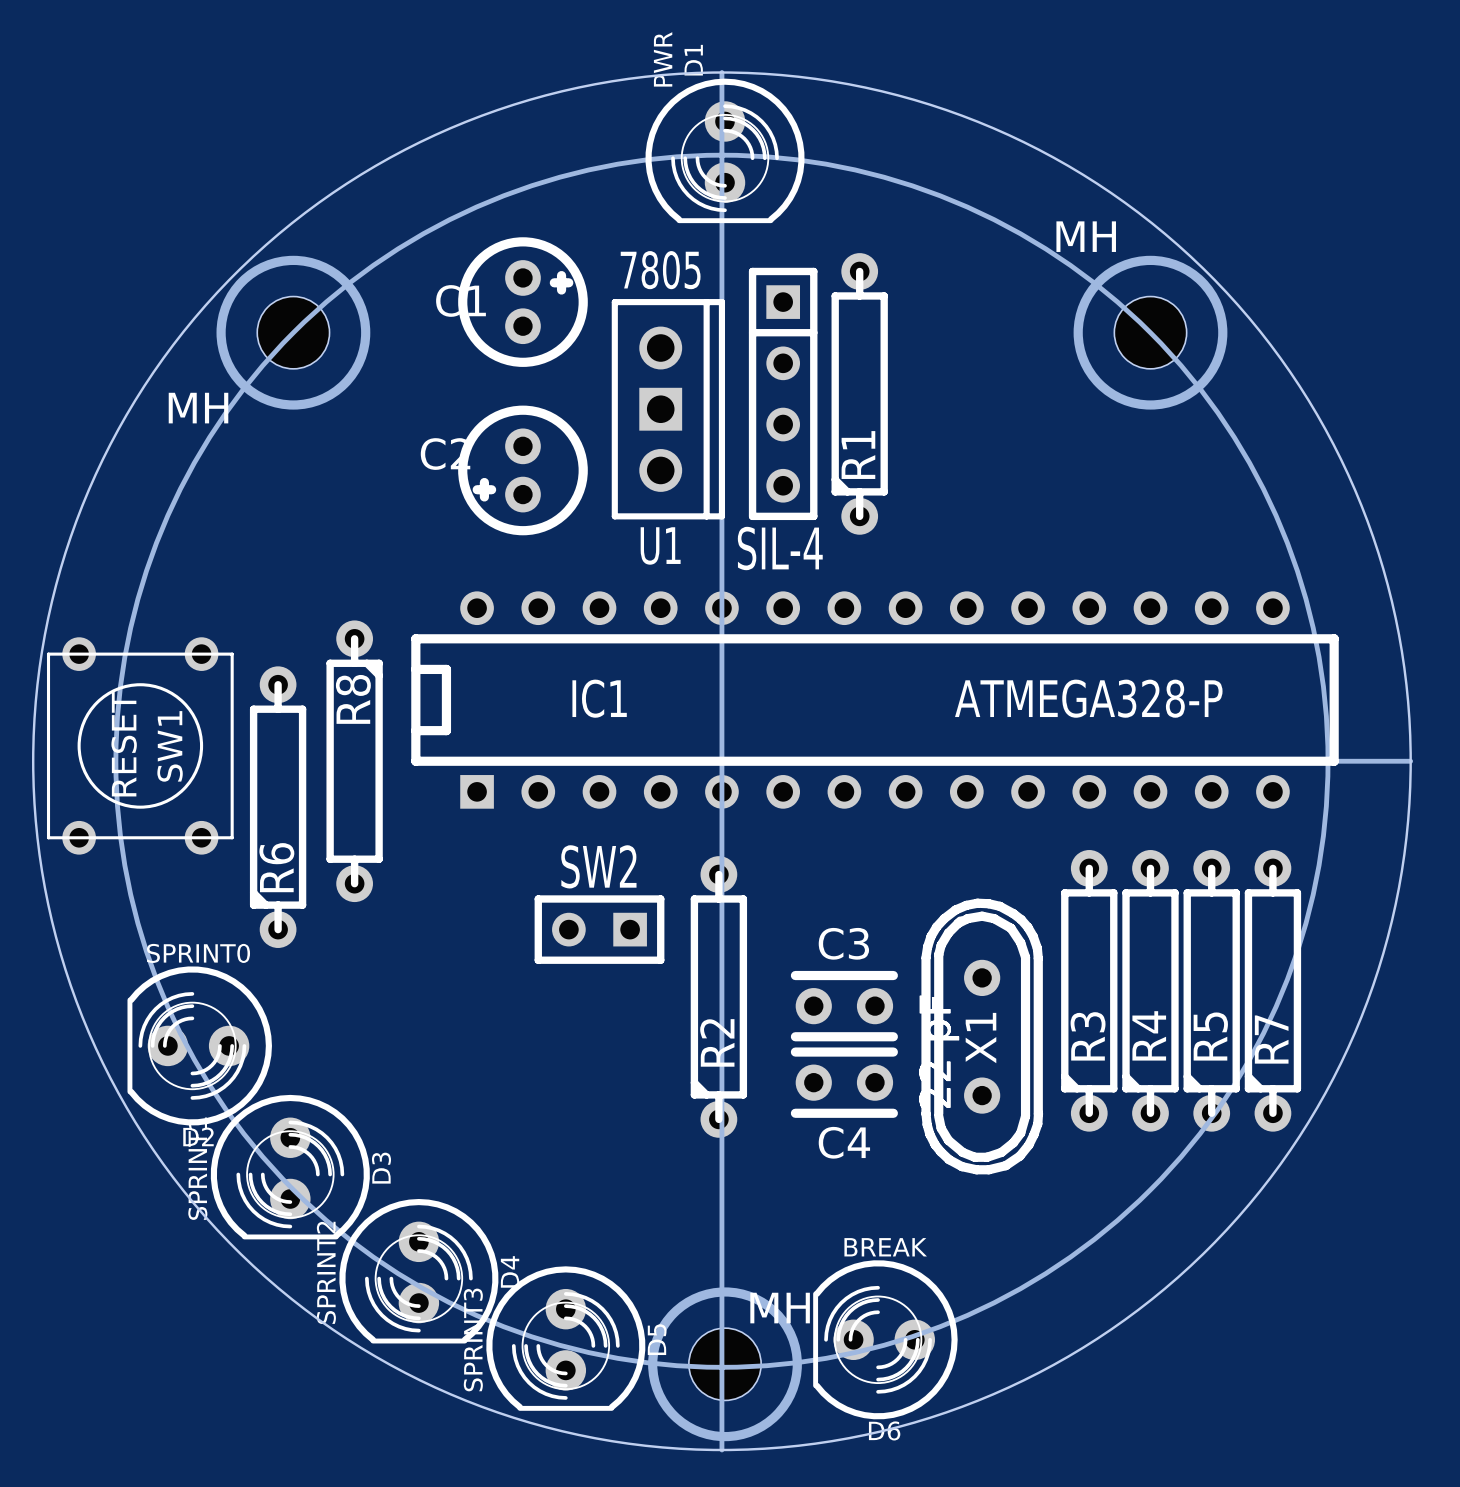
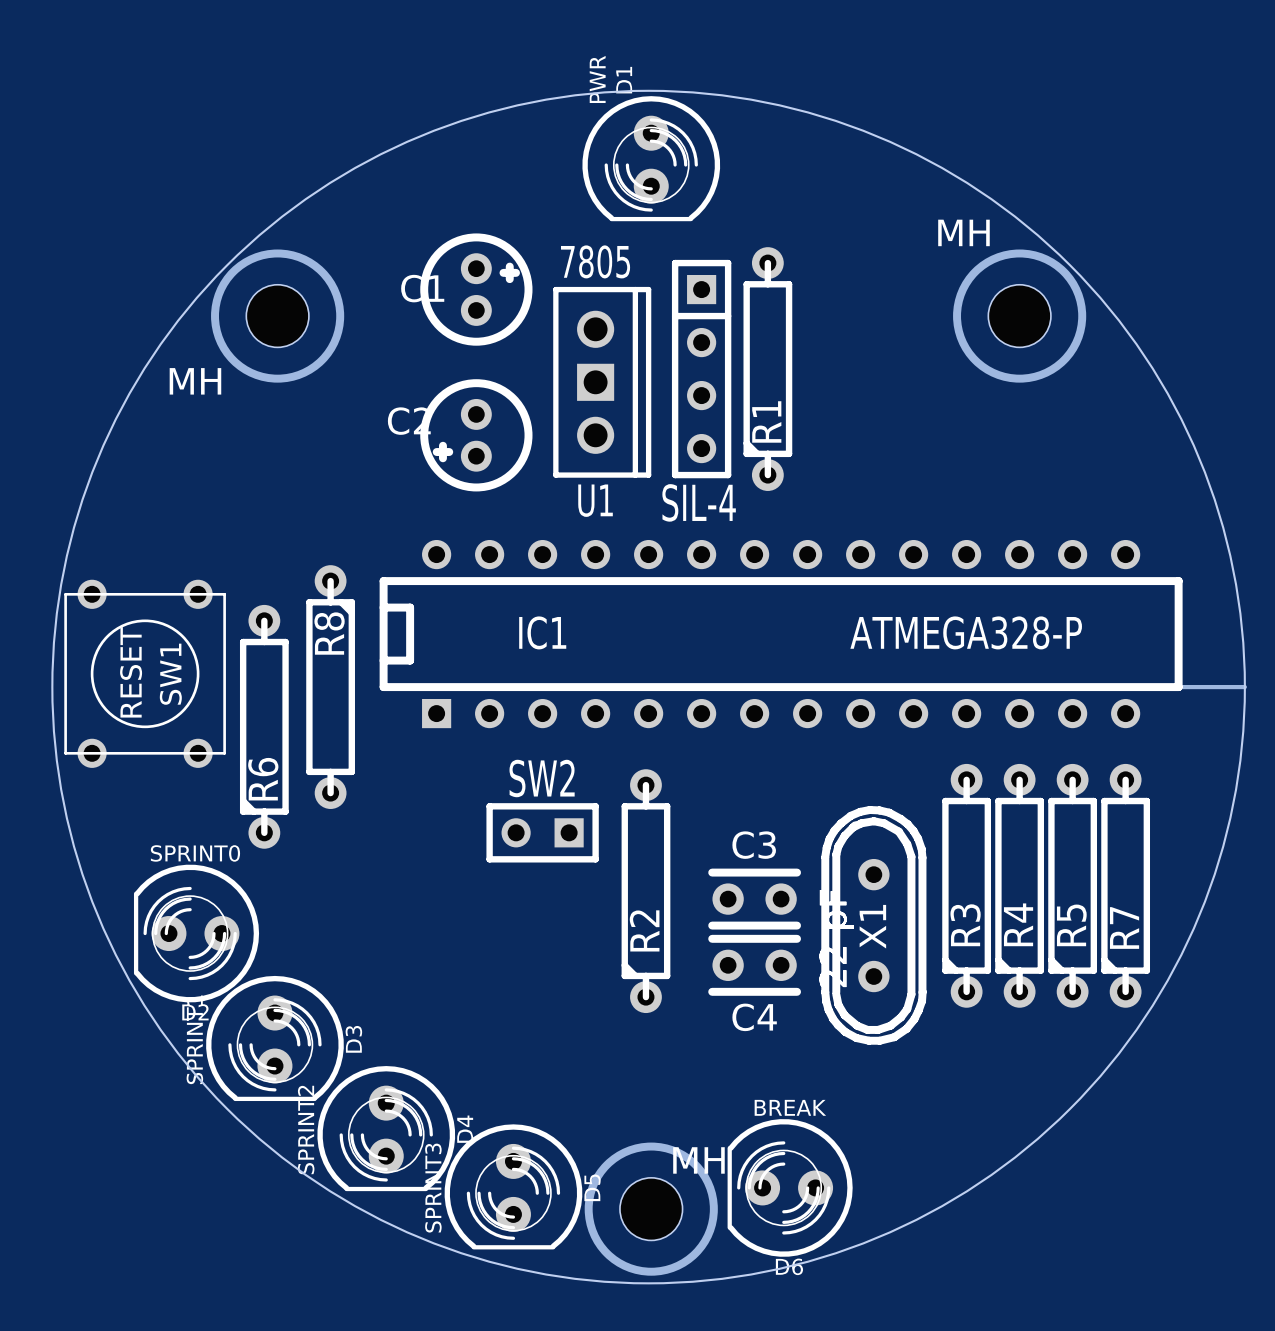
line: (721, 72) (721, 1449) -> none
drawing: [113, 152, 1331, 1370] -> none

